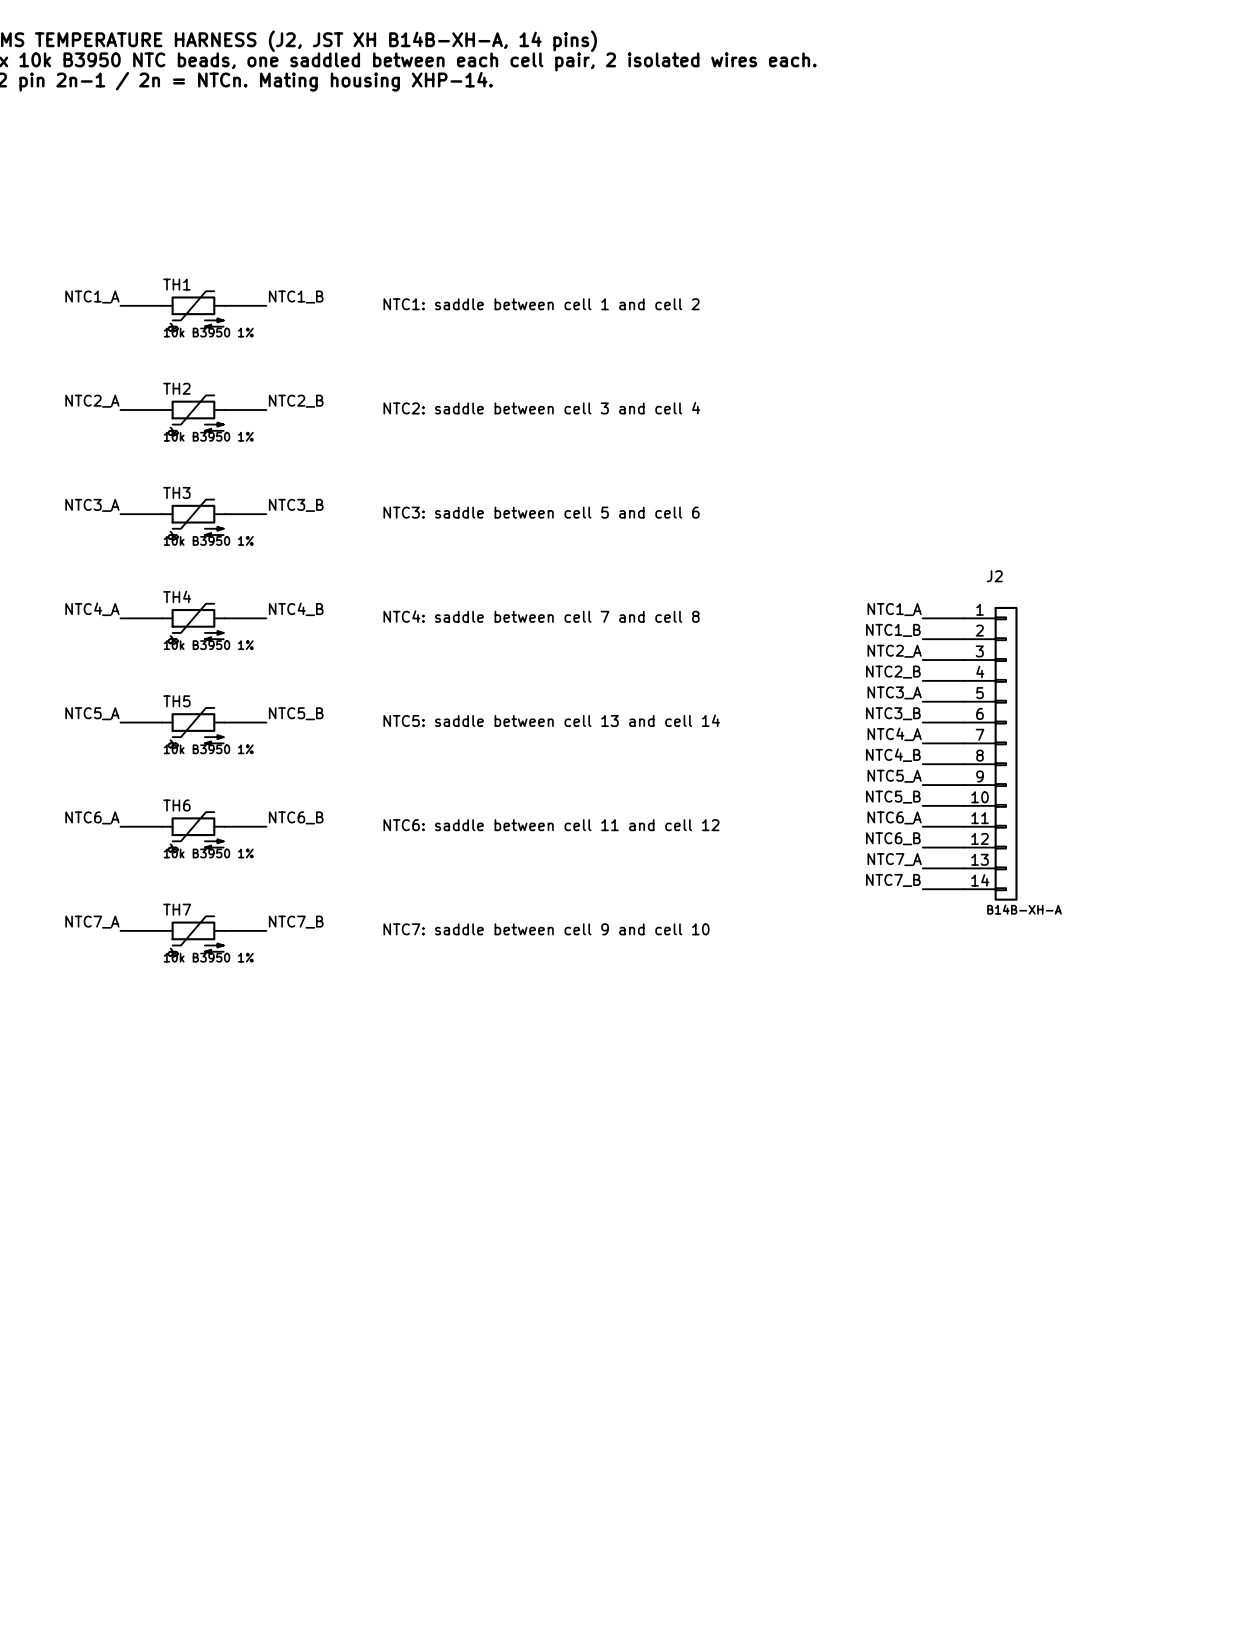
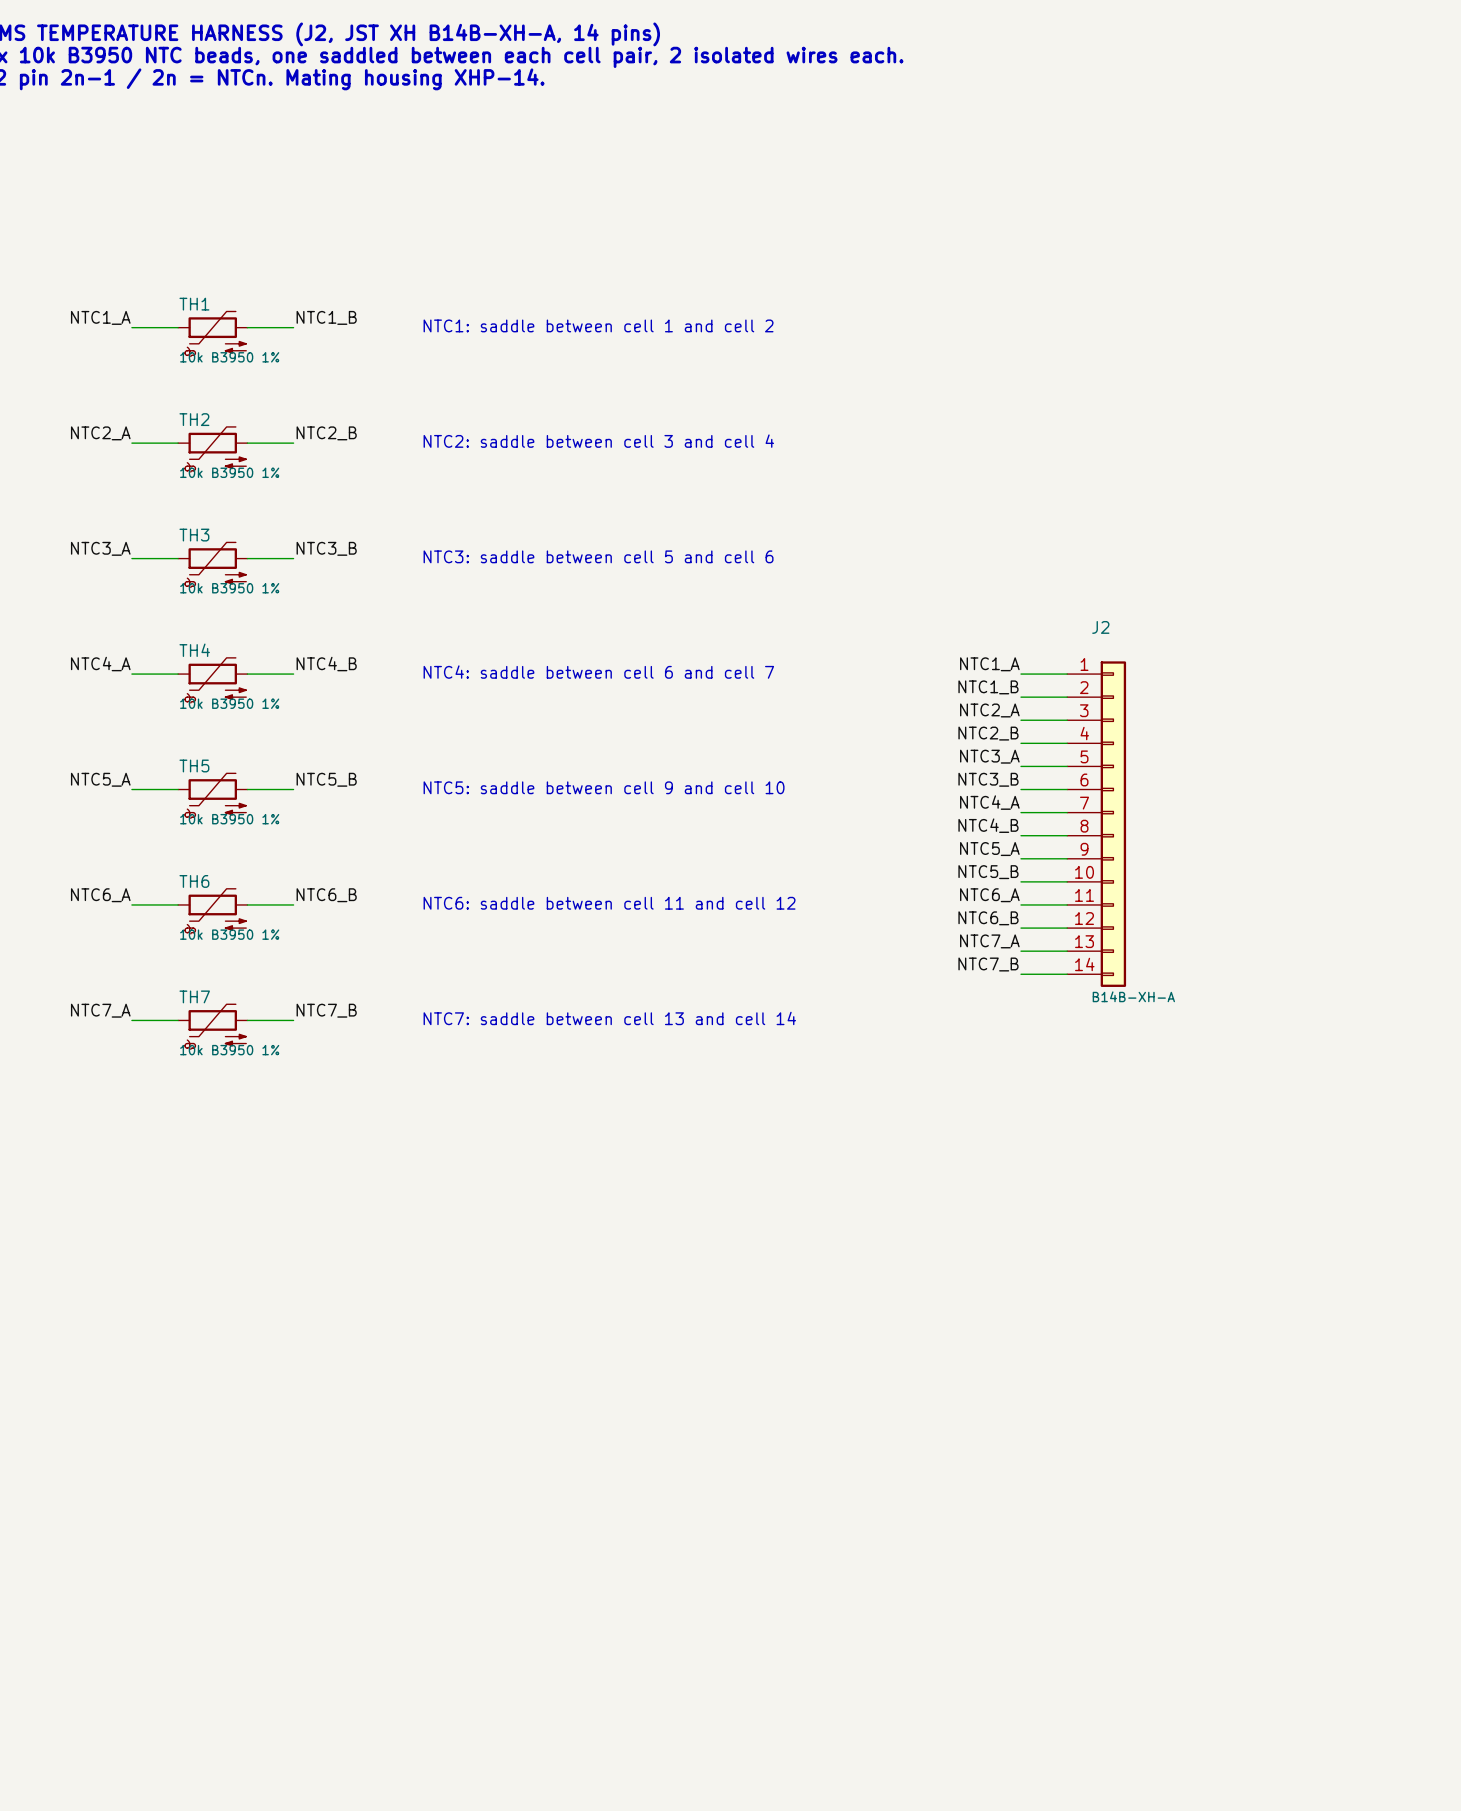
text: NTC4: saddle between cell 7 and cell 8 (541, 616) -> NTC4: saddle between cell 6 and cell 7 (598, 672)
text: NTC5: saddle between cell 13 and cell 14 (551, 720) -> NTC5: saddle between cell 9 and cell 10 (604, 787)
text: NTC7: saddle between cell 9 and cell 10 (546, 929) -> NTC7: saddle between cell 13 and cell 14 (609, 1018)

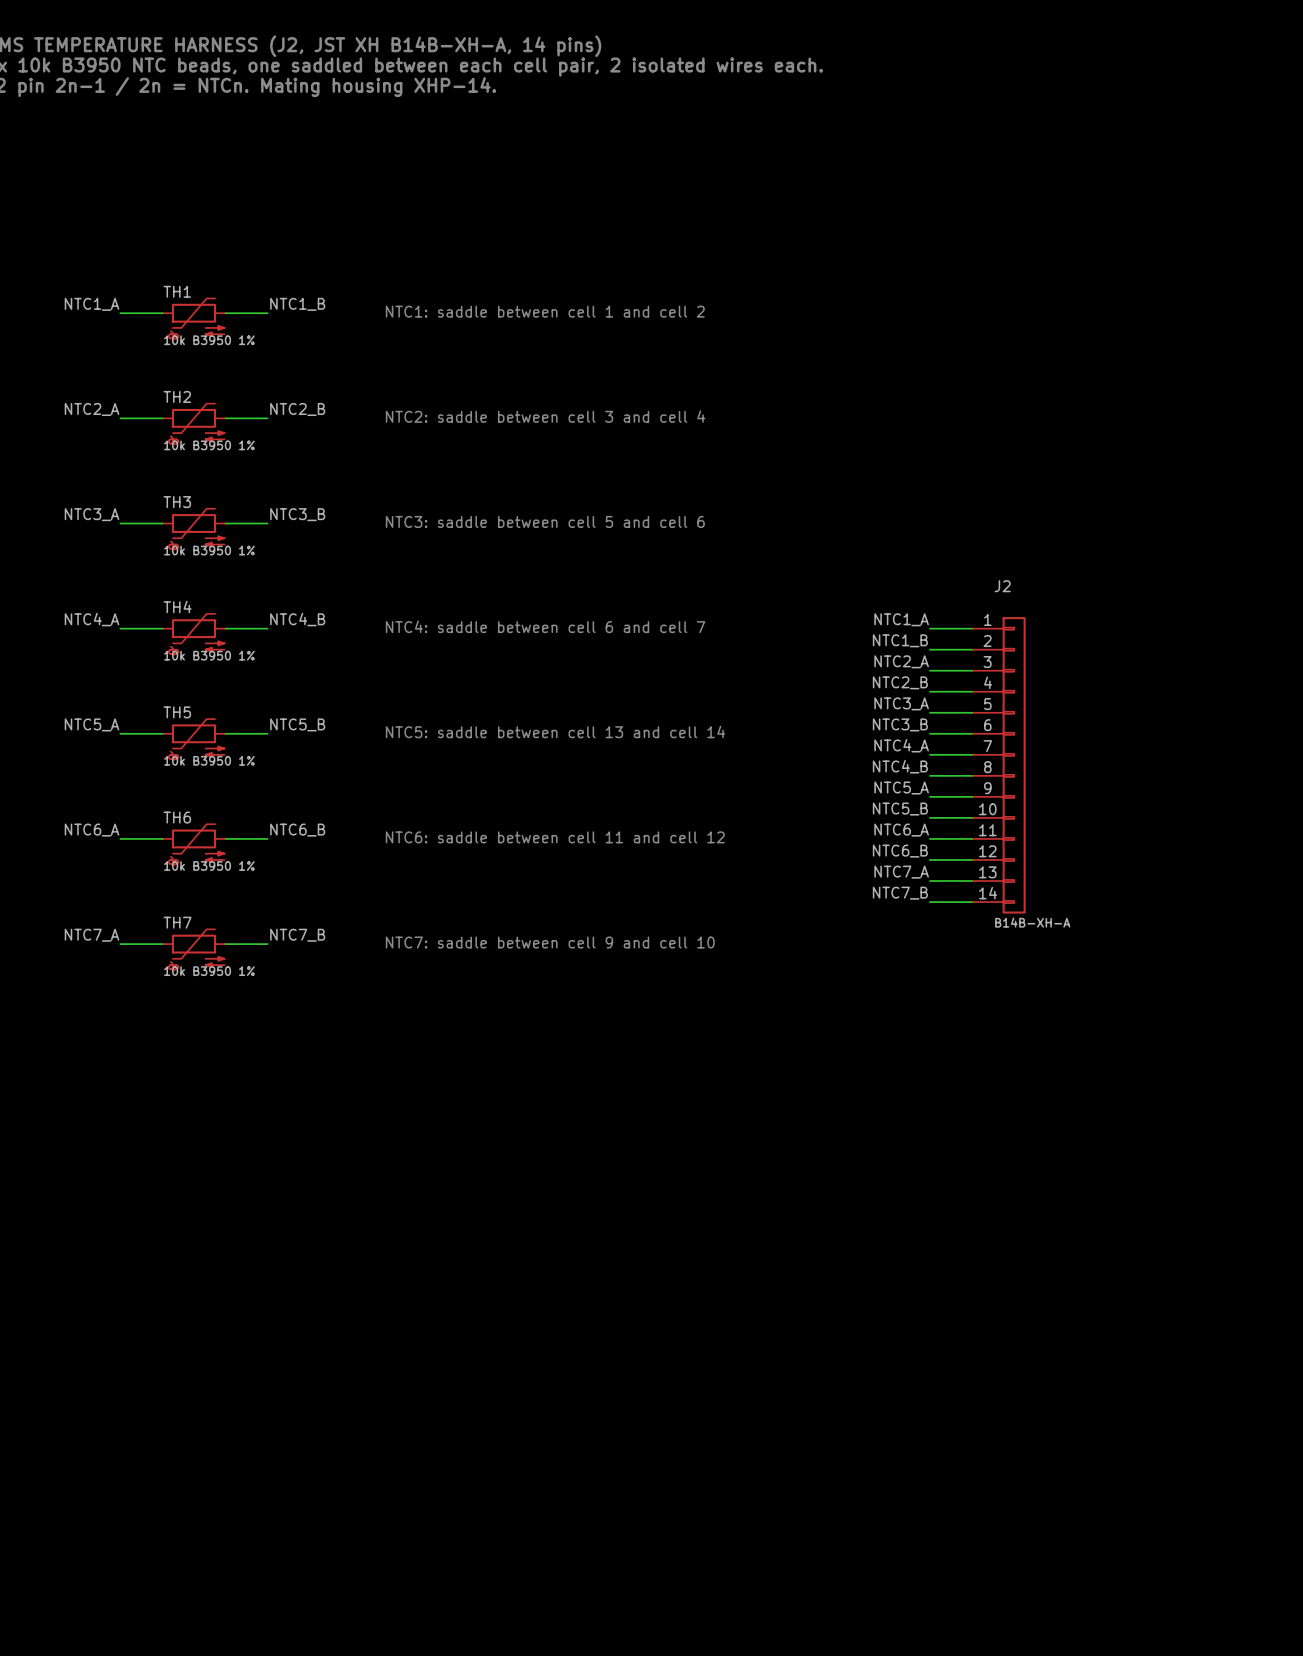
text: NTC5: saddle between cell 9 and cell 10 (604, 787) -> NTC5: saddle between cell 13 and cell 14 (555, 731)
text: NTC7: saddle between cell 13 and cell 14 (609, 1018) -> NTC7: saddle between cell 9 and cell 10 (550, 942)

